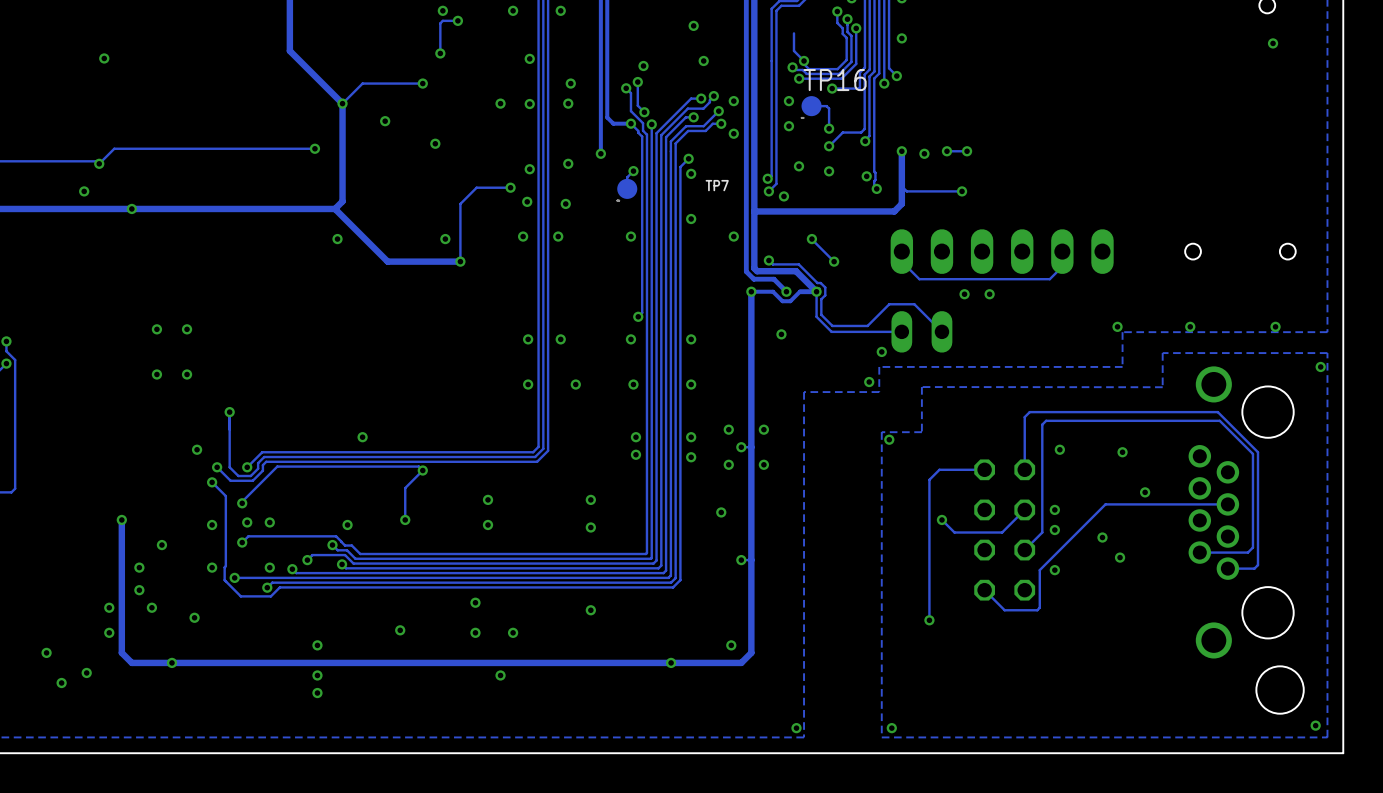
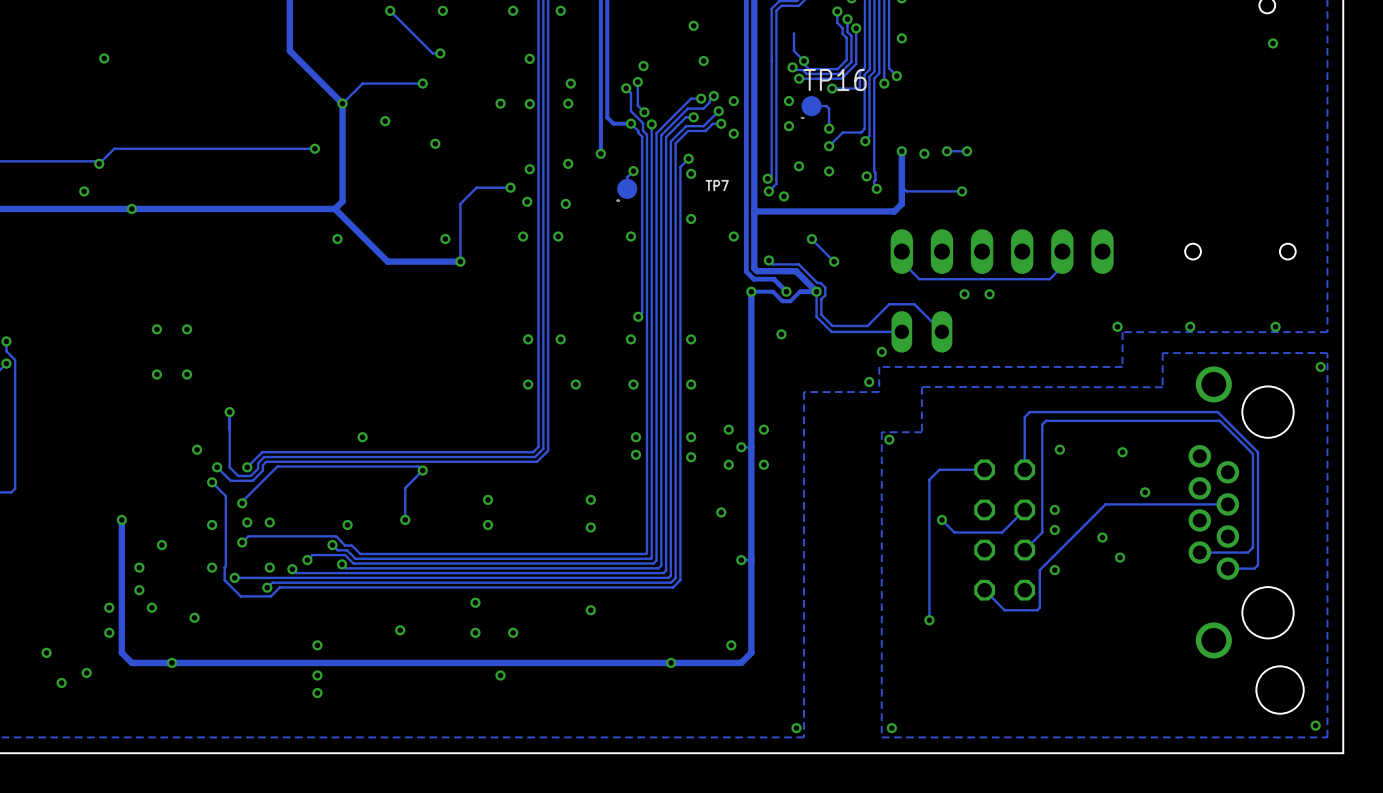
via: none -> (390, 10)
track: (457, 20) (442, 20) (440, 23) (440, 53) -> (390, 10) (432, 53) (440, 53)
via: (457, 20) -> none

